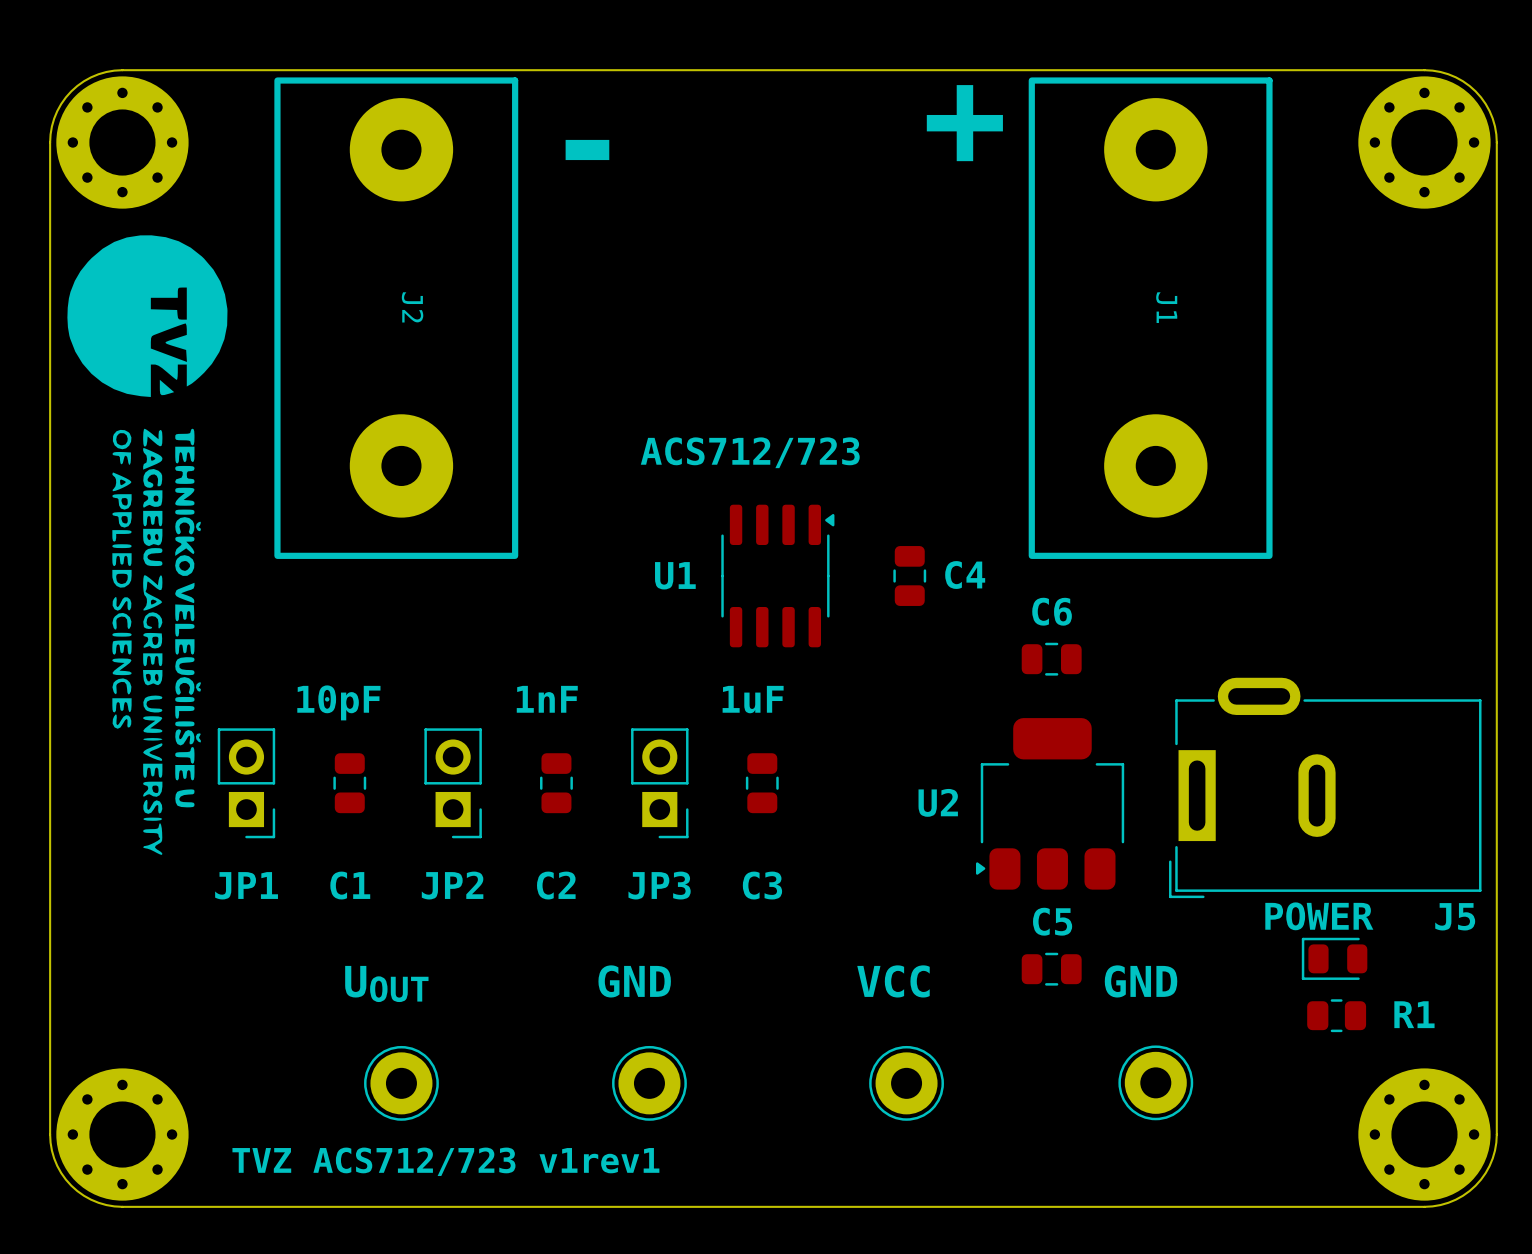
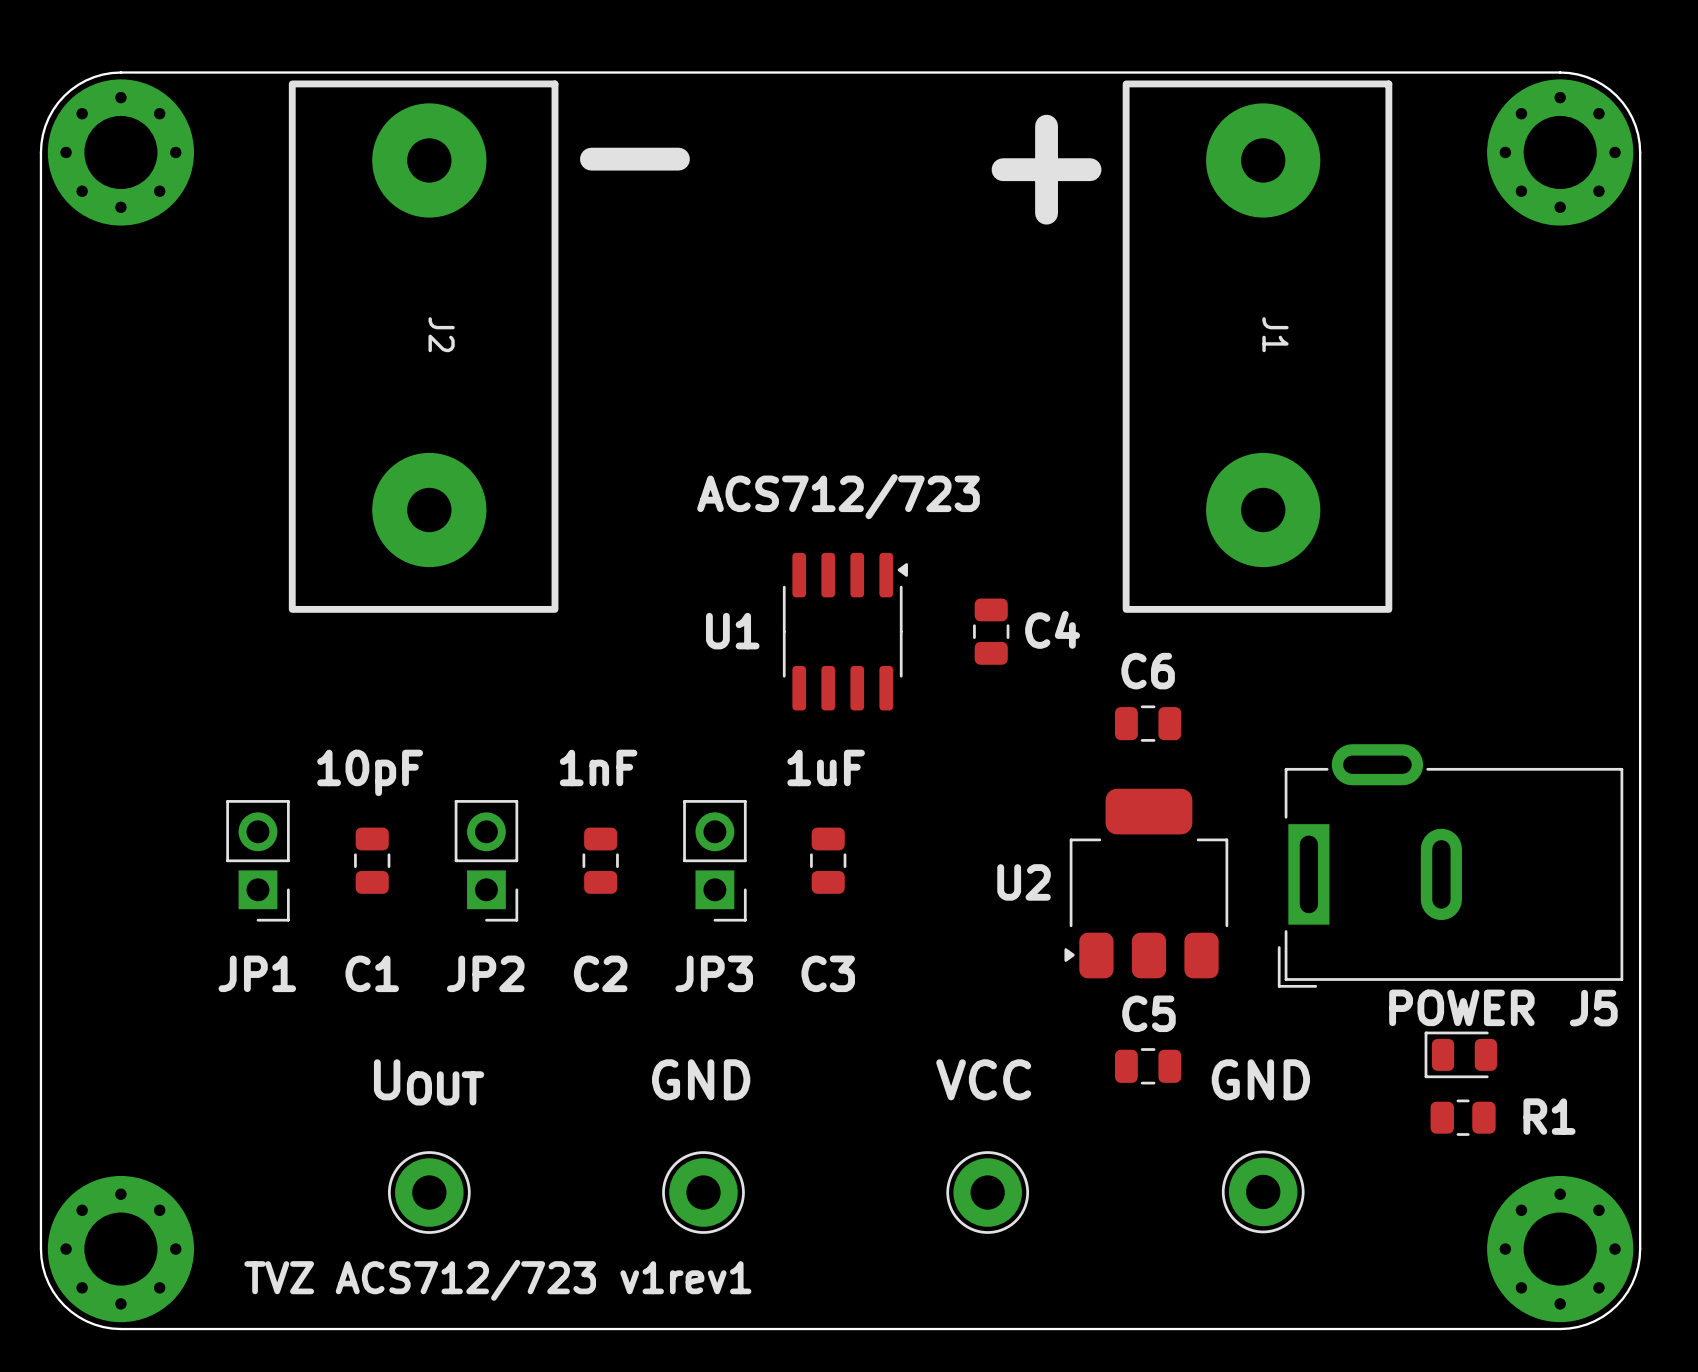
drawing: [67, 235, 228, 855] -> none

